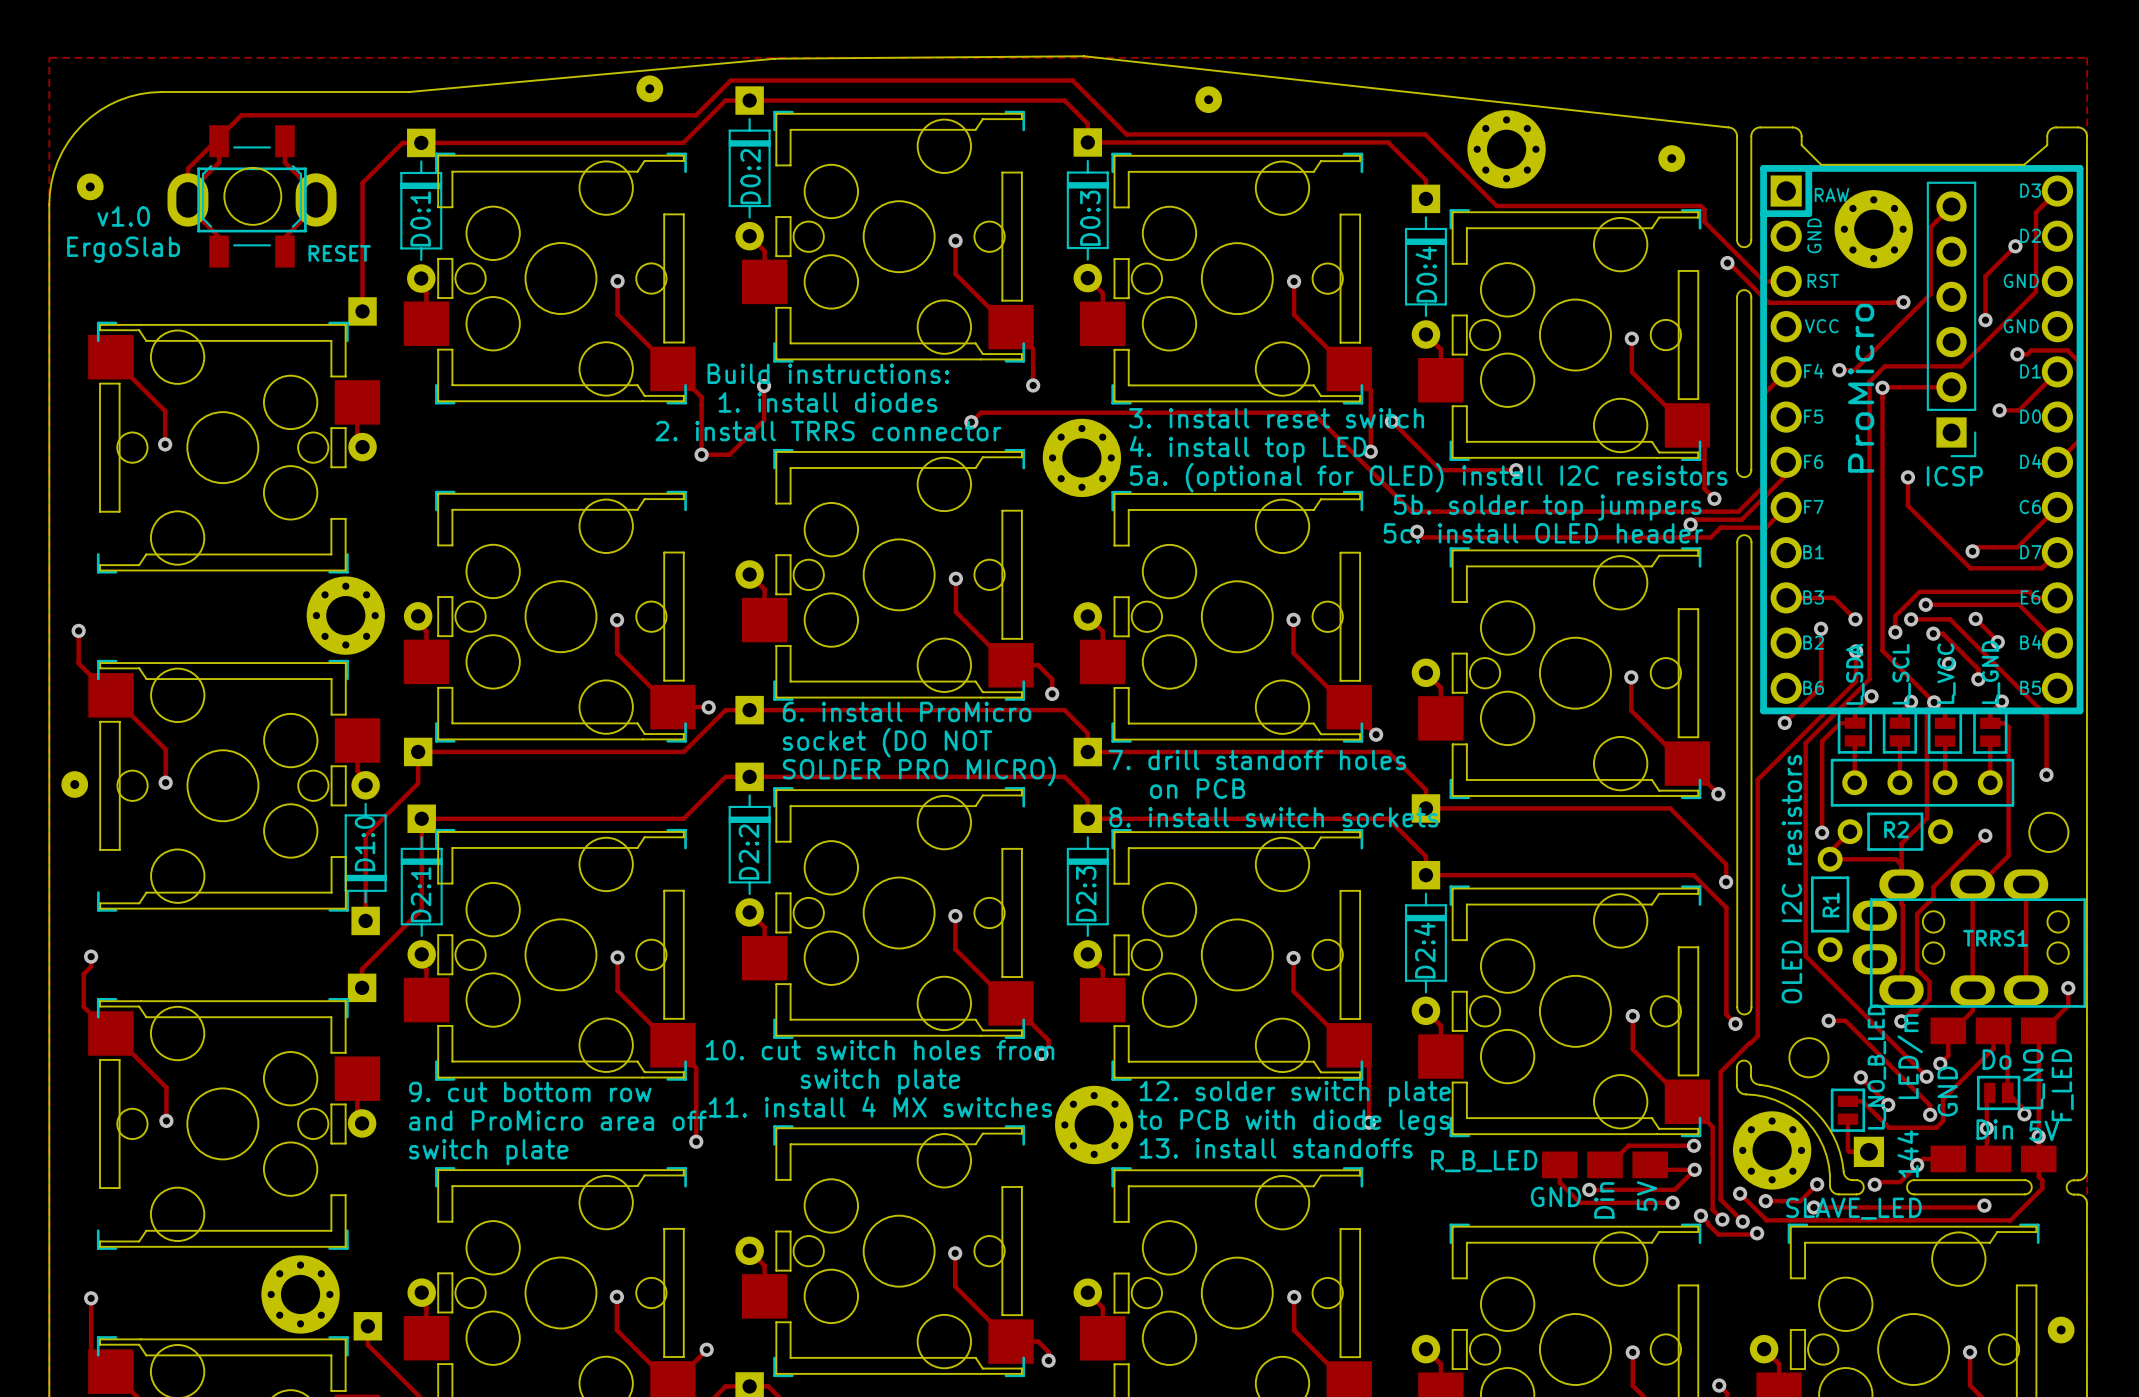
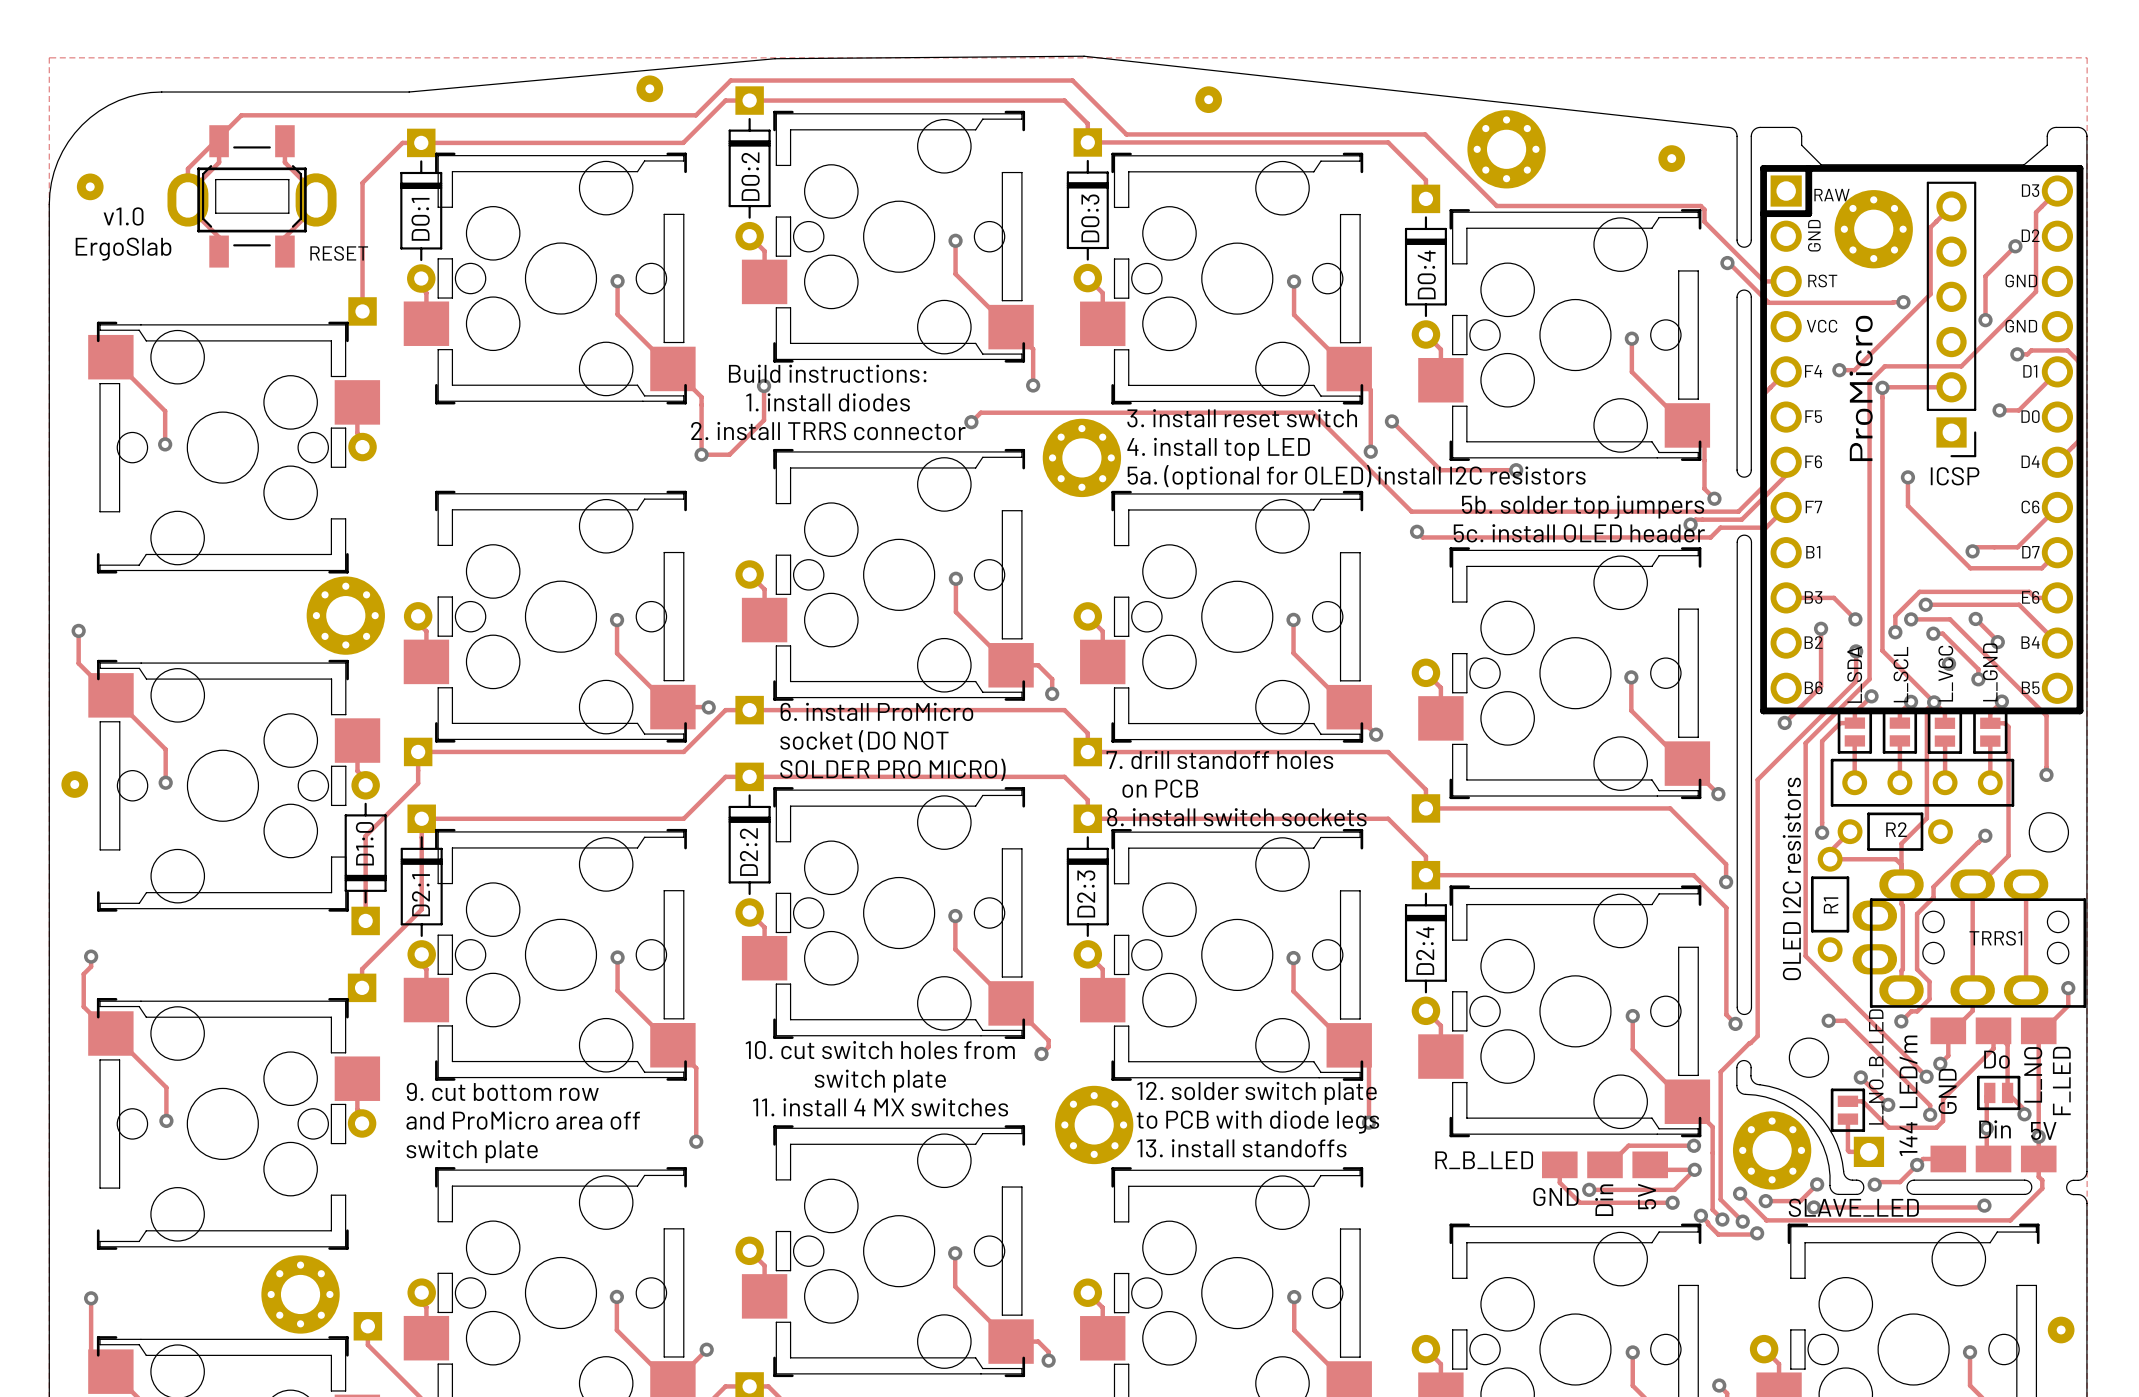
round board edge: [223, 167, 282, 226] -> none
board edge: none -> (215, 179) (288, 179) (288, 213) (215, 213) (215, 179)

